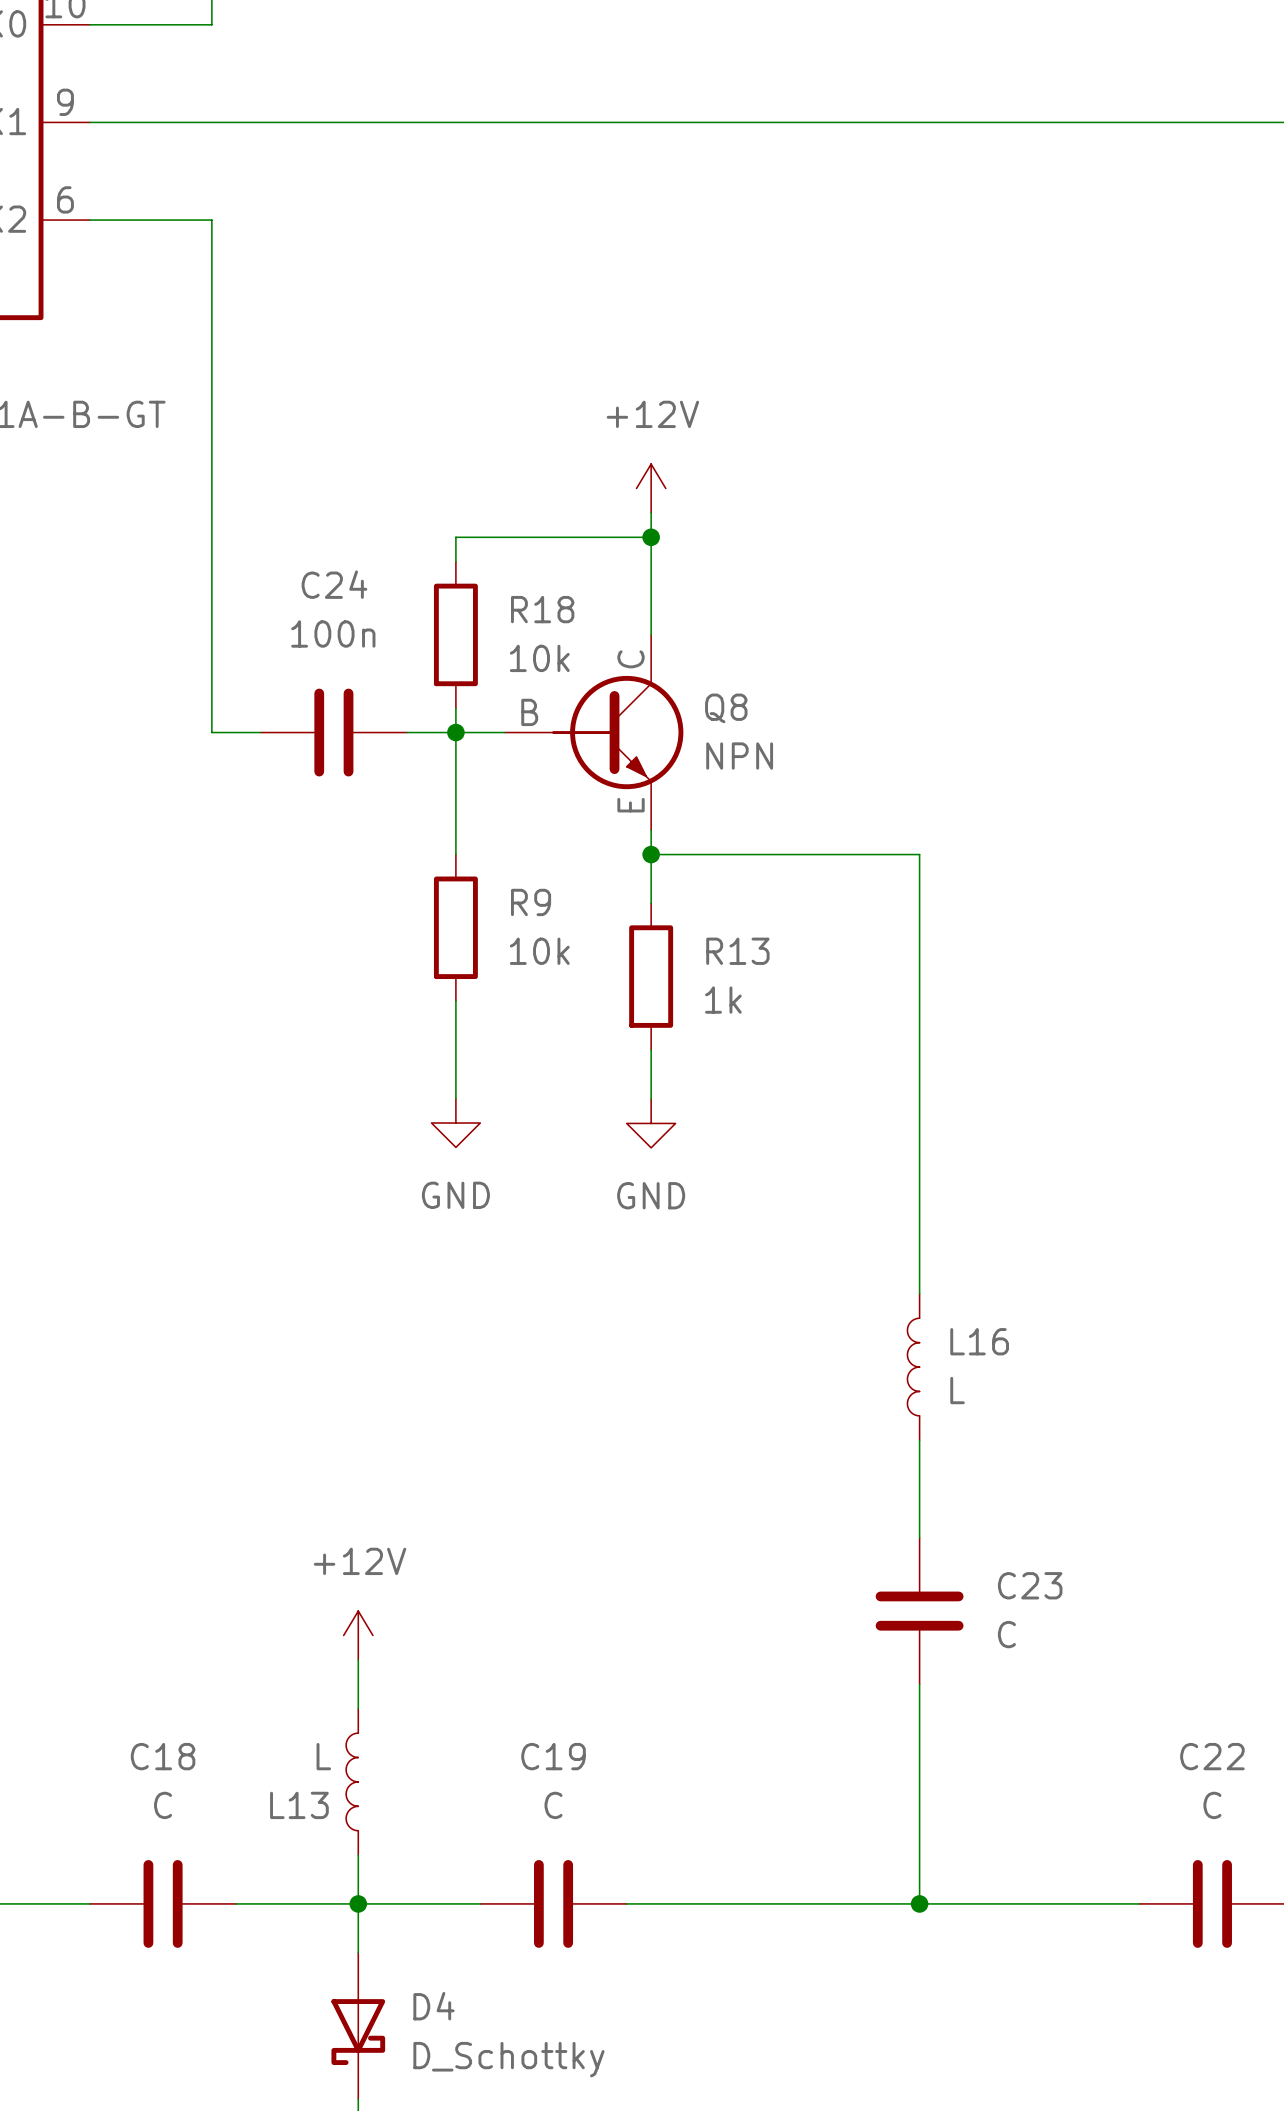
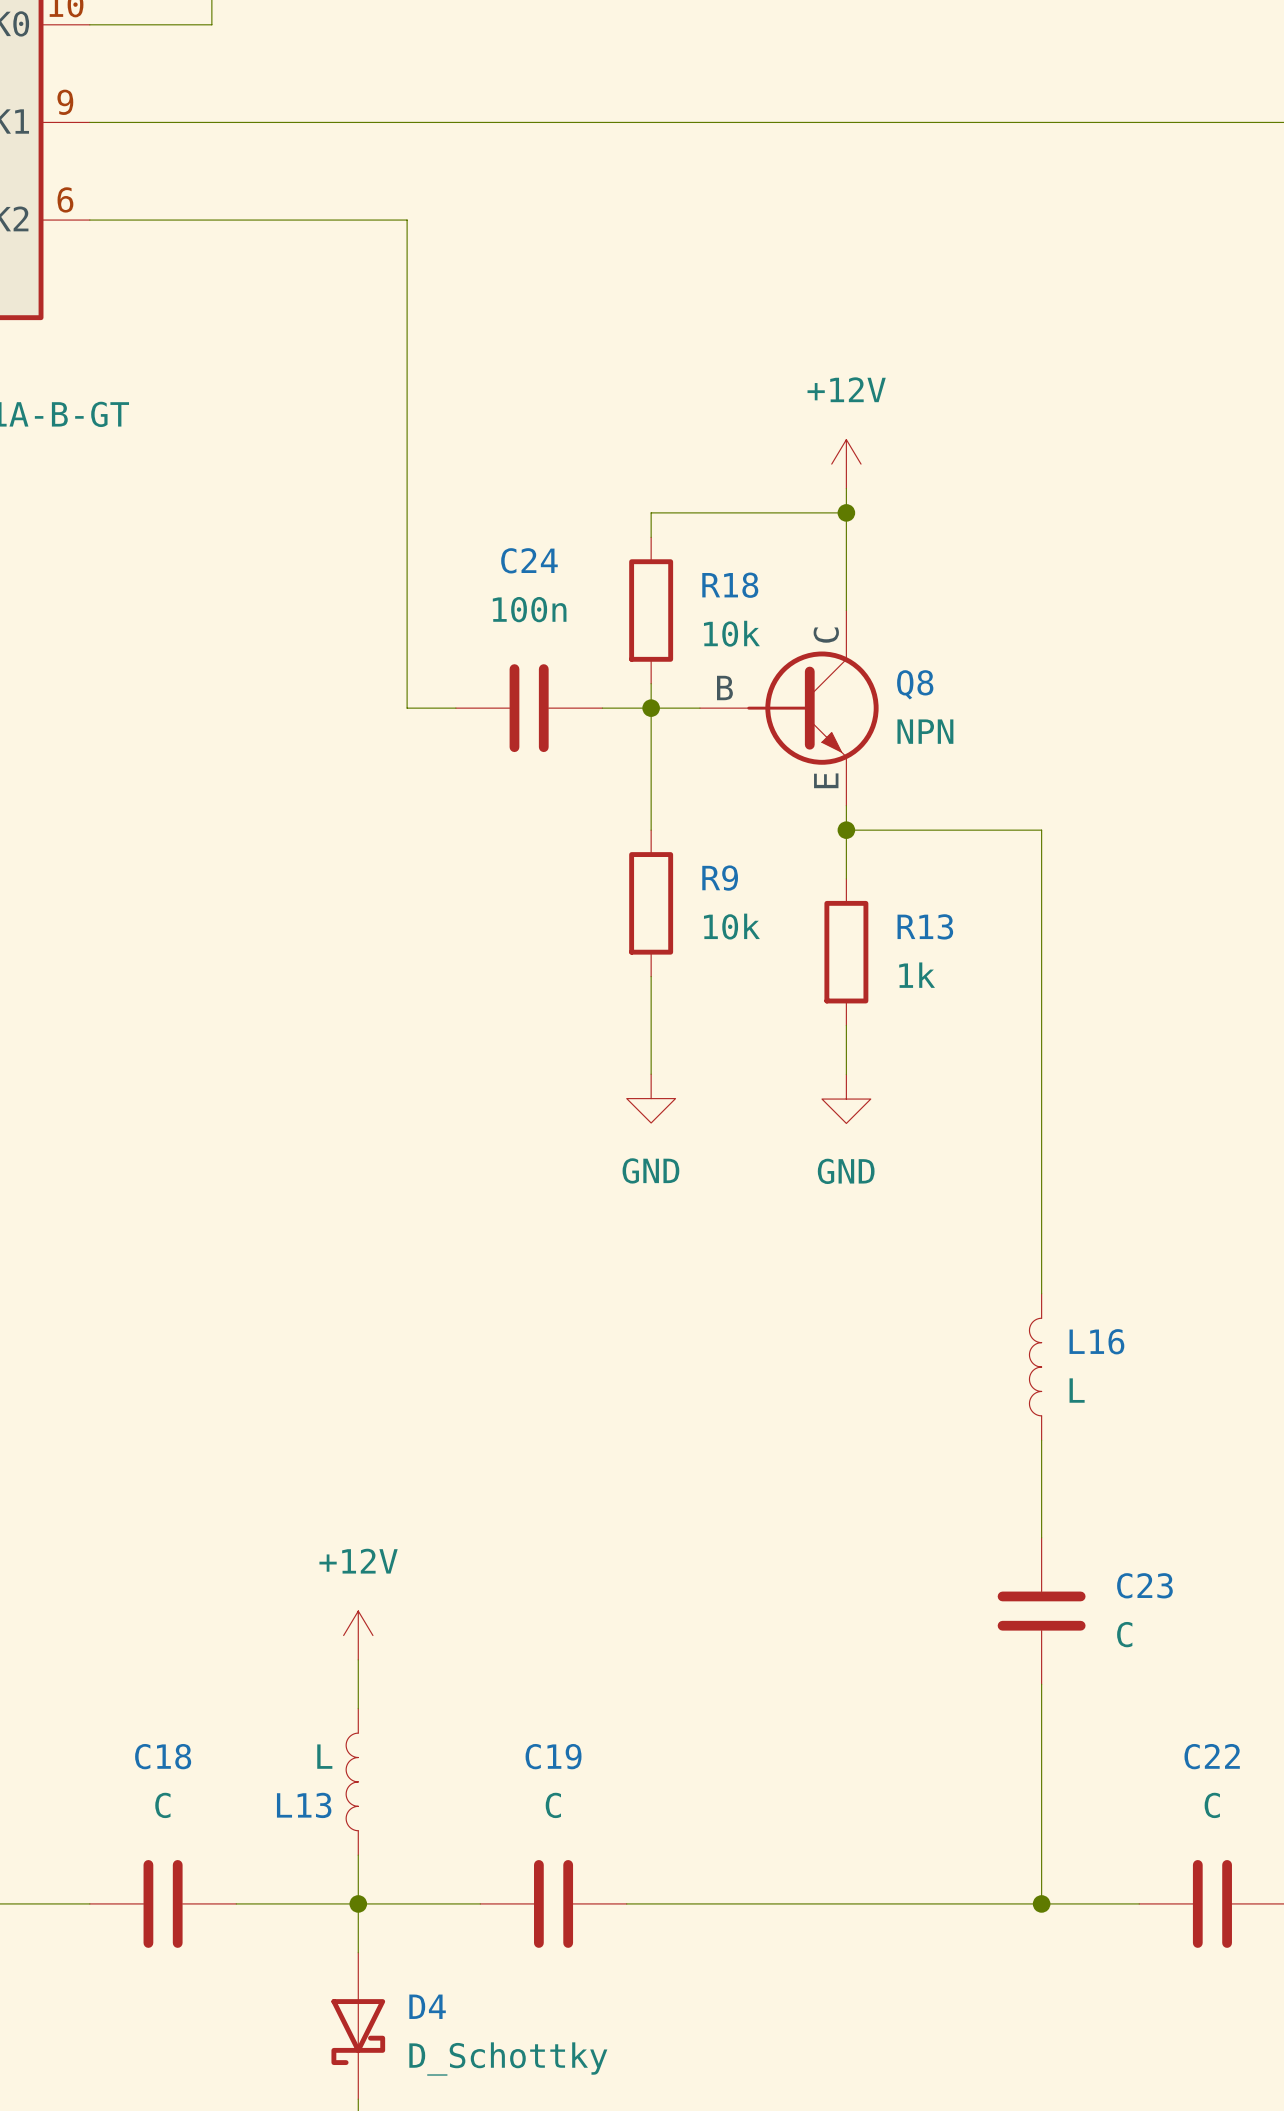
wire: (211, 220) (211, 732) (260, 732) -> (211, 220) (407, 220) (407, 708) (455, 708)
power symbol position: +12V (651, 488) -> +12V (846, 464)
wire: none -> (846, 488) (846, 610)
wire: none -> (651, 512) (846, 512)
junction: none -> (846, 512)
junction: (651, 537) -> none
wire: (455, 561) (455, 537) (651, 537) (651, 634) -> none
R18 position: (455, 634) -> (651, 610)
wire: (455, 708) (455, 854) -> none
junction: none -> (651, 708)
C24 position: (333, 732) -> (529, 708)
wire: (407, 732) (504, 732) -> (602, 708) (699, 708)
junction: (455, 732) -> none
Q8 position: (594, 732) -> (789, 708)
wire: none -> (846, 805) (846, 878)
wire: (651, 830) (651, 903) -> (651, 830) (651, 683)
wire: none -> (846, 830) (1041, 830) (1041, 1293)
junction: none -> (846, 830)
wire: (651, 854) (919, 854) (919, 1293) -> none
junction: (651, 854) -> none
R9 position: (455, 927) -> (651, 903)
wire: none -> (651, 976) (651, 1049)
R13 position: (651, 976) -> (846, 952)
wire: (455, 1000) (455, 1098) -> none
wire: none -> (846, 1025) (846, 1074)
power symbol: none -> GND (846, 1099)
power symbol: GND (455, 1123) -> none
power symbol position: GND (651, 1123) -> GND (651, 1098)
L16 position: (913, 1367) -> (1035, 1367)
wire: (919, 1440) (919, 1537) -> (1041, 1440) (1041, 1537)
C23 position: (919, 1611) -> (1041, 1611)
wire: (919, 1684) (919, 1903) -> (1041, 1684) (1041, 1903)
junction: (919, 1903) -> none
junction: none -> (1041, 1903)

